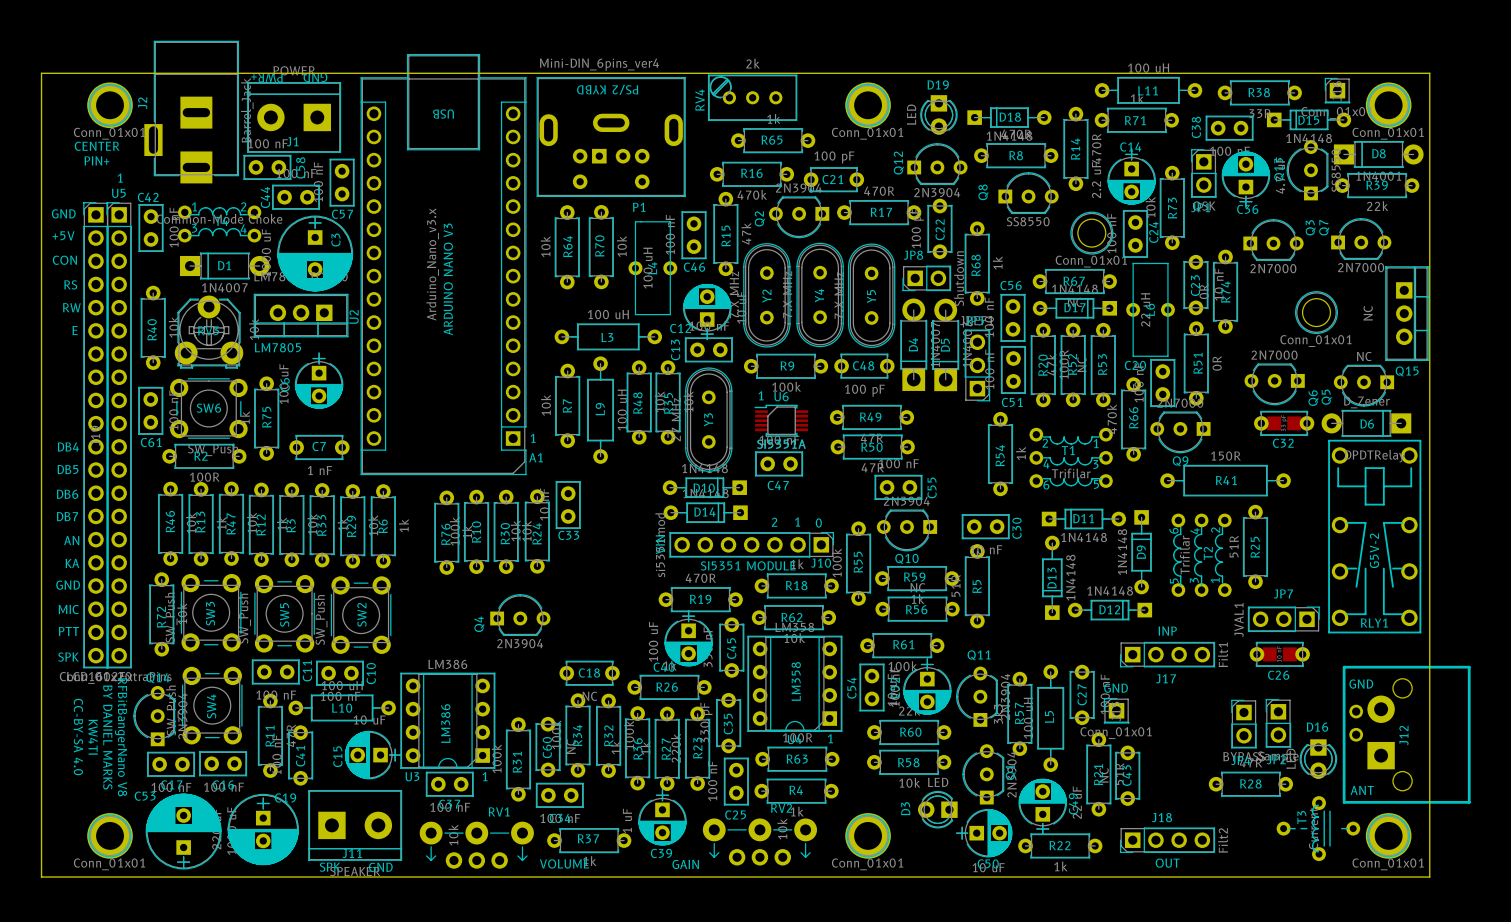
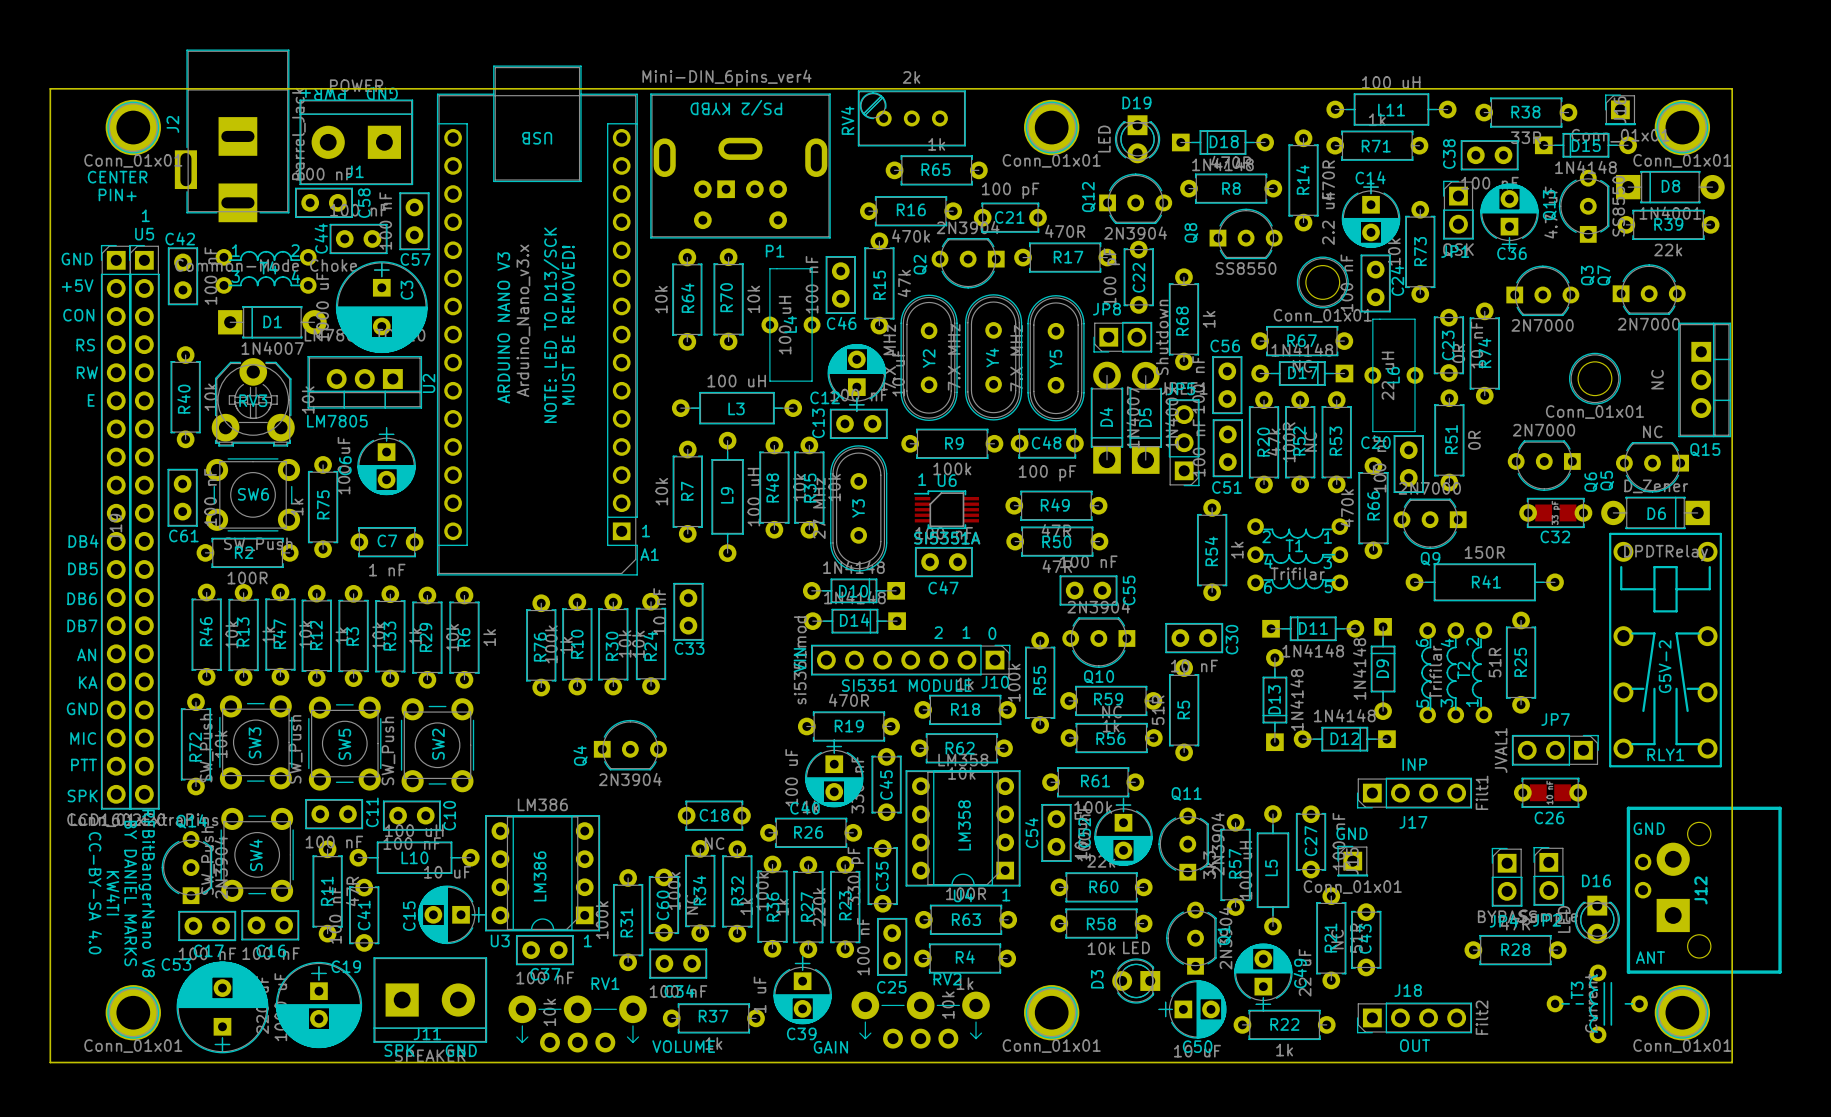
text: none -> NOTE: LED TO D13/SCK (551, 325)
text: none -> MUST BE REMOVED! (568, 325)
text position: ARDUINO NANO V3 (448, 279) -> ARDUINO NANO V3 (503, 327)

